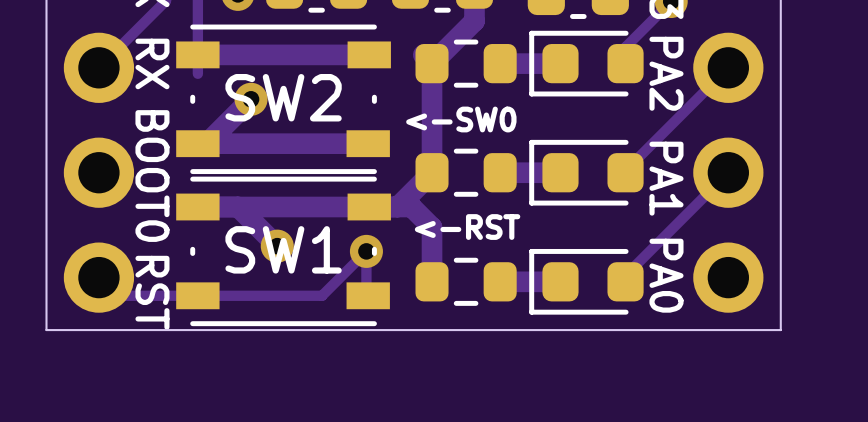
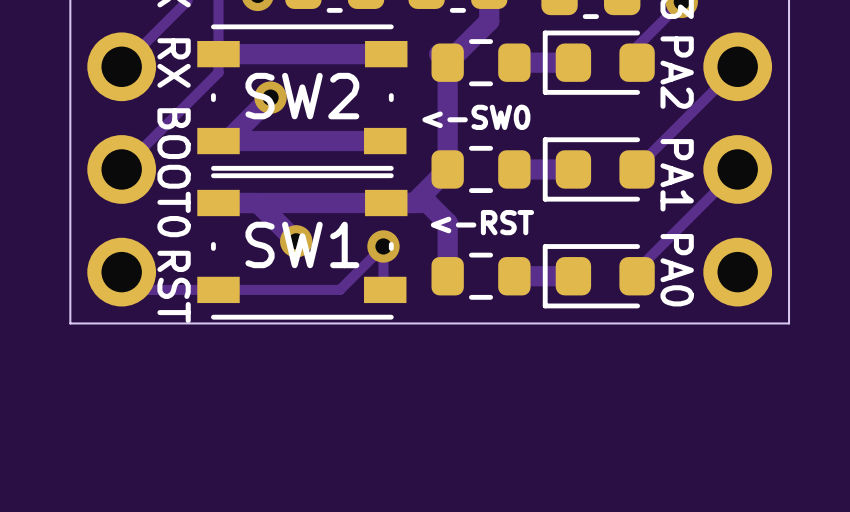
track: none -> (218, 72) (121, 169)

